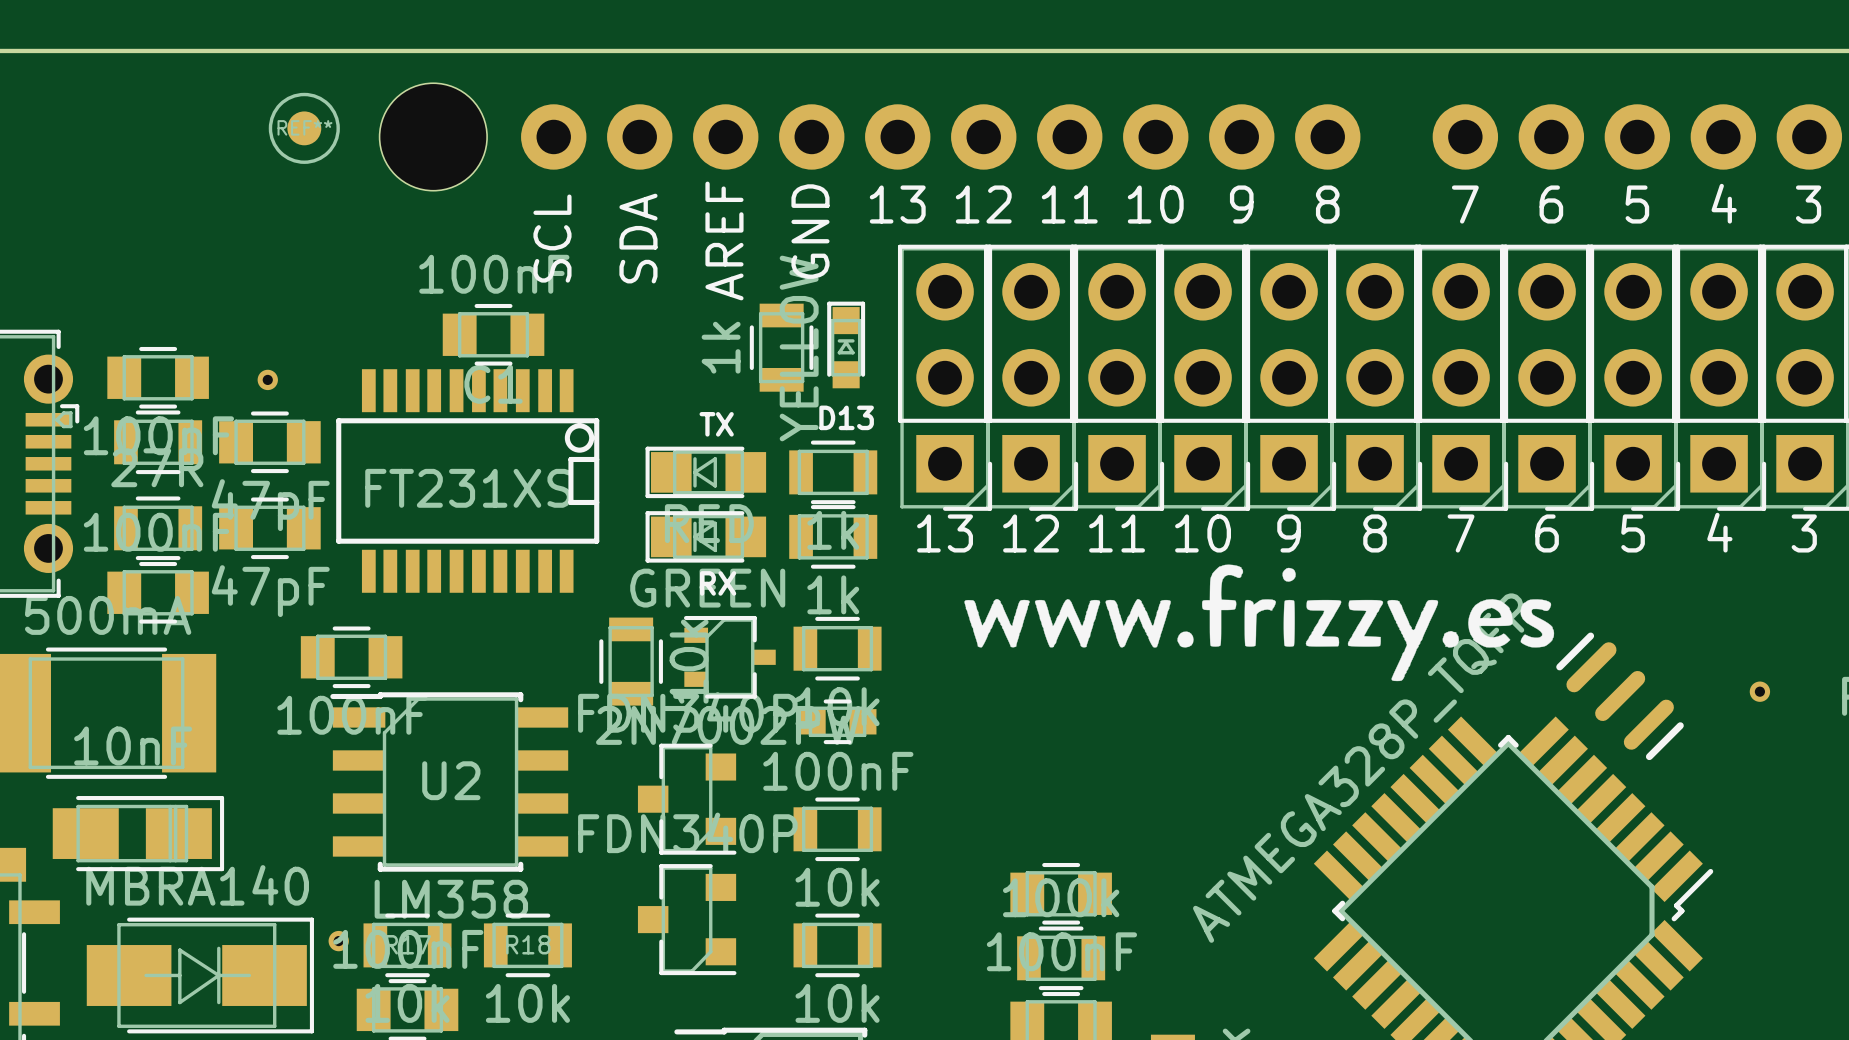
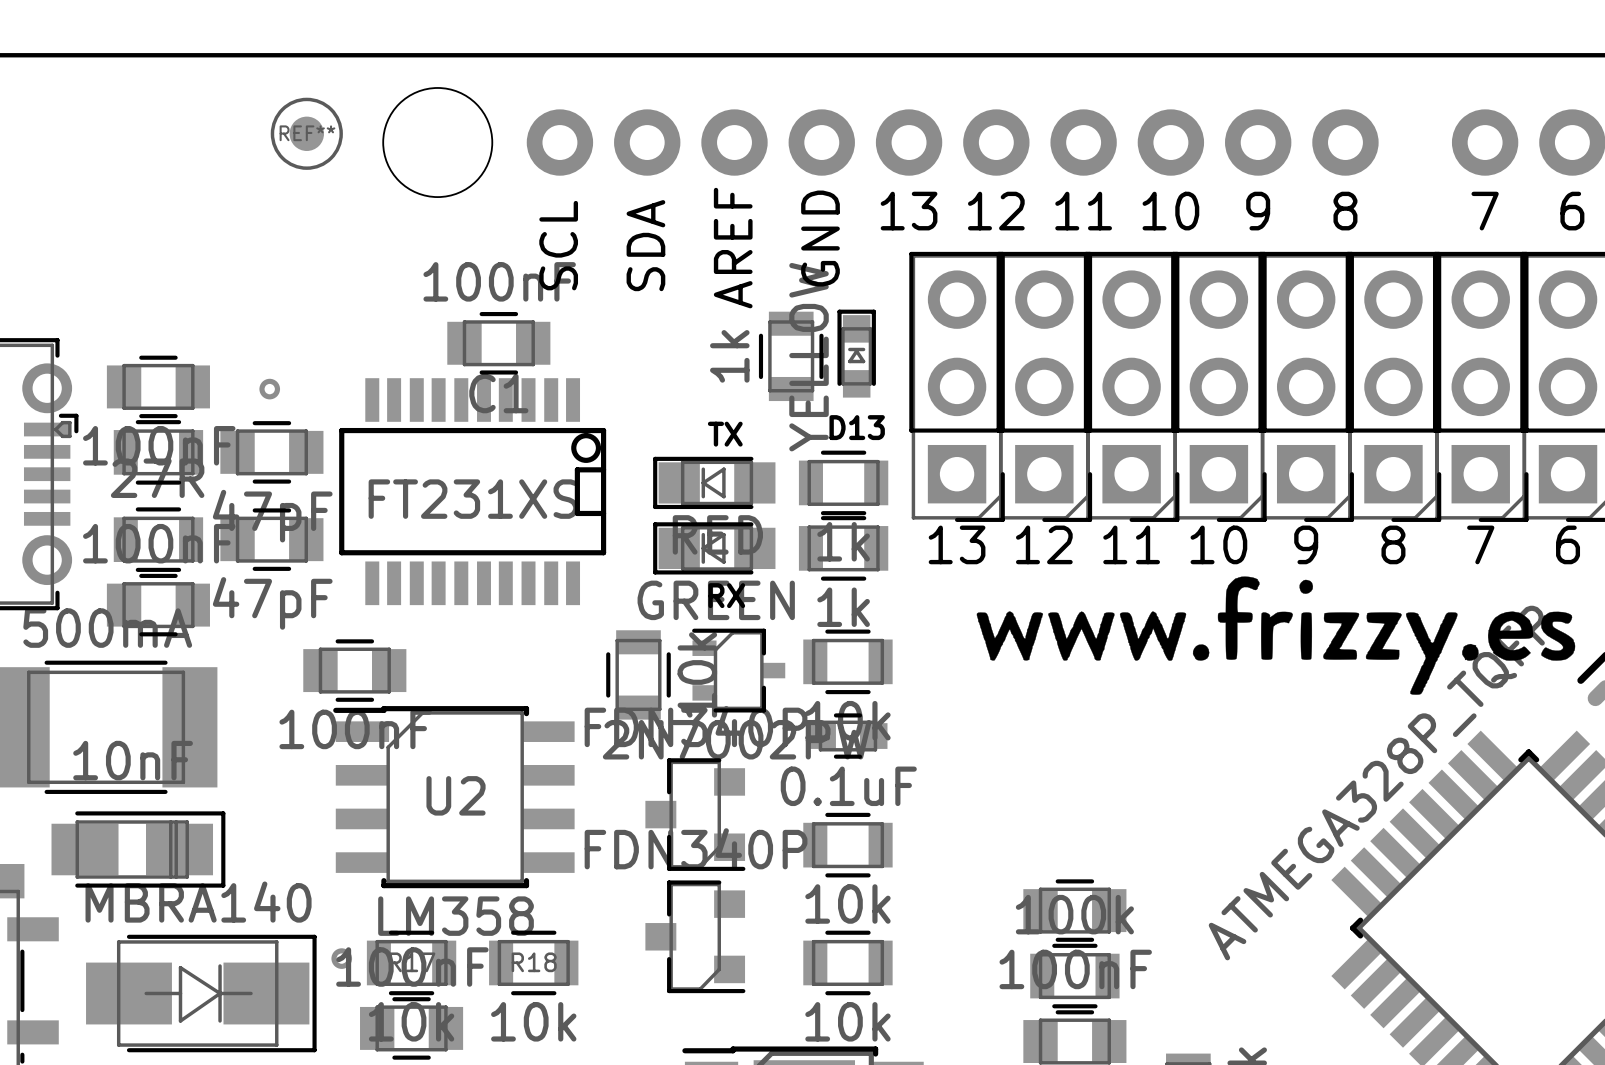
part value: 100nF (838, 771) -> 0.1uF (848, 786)

